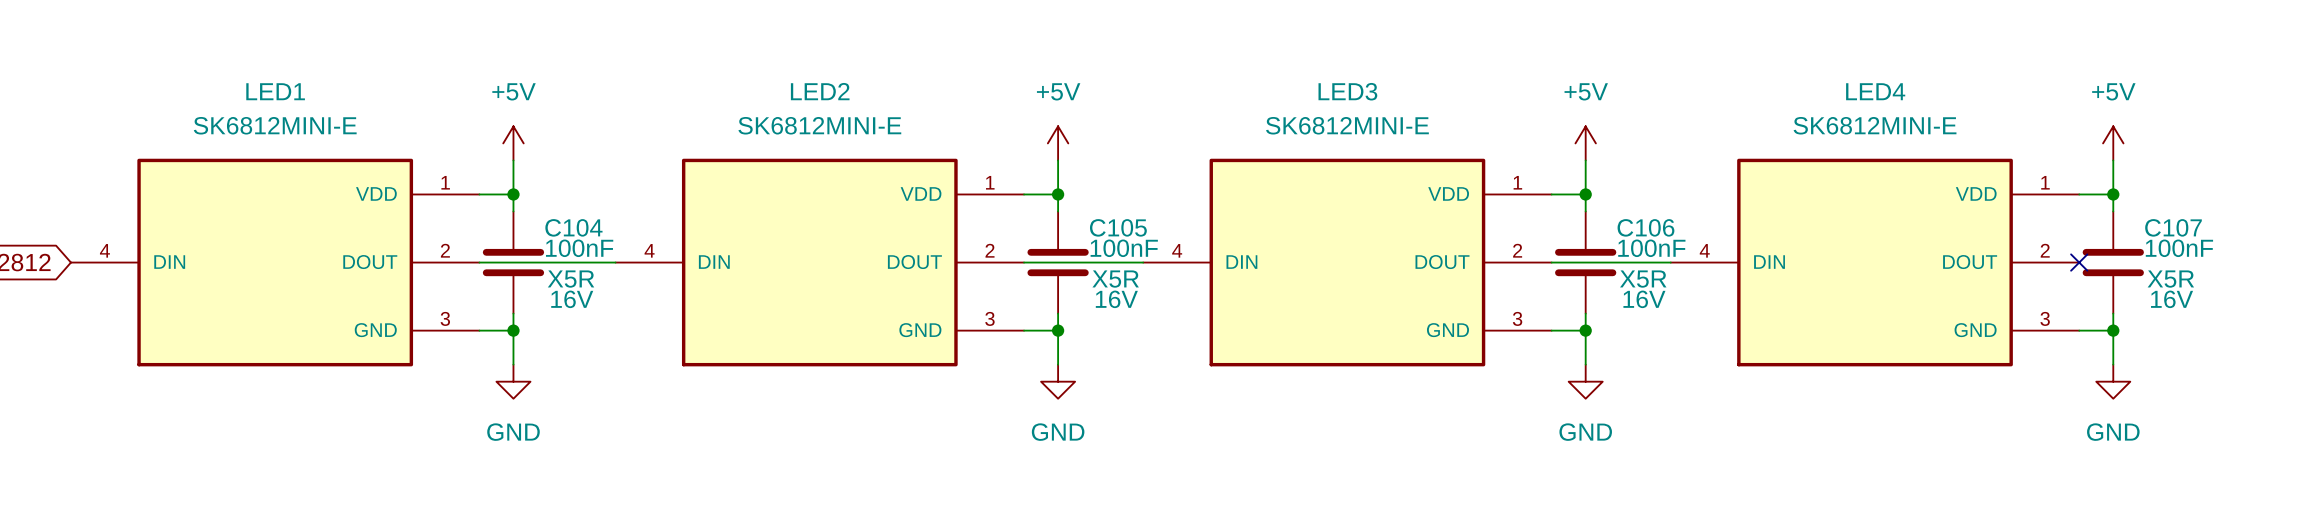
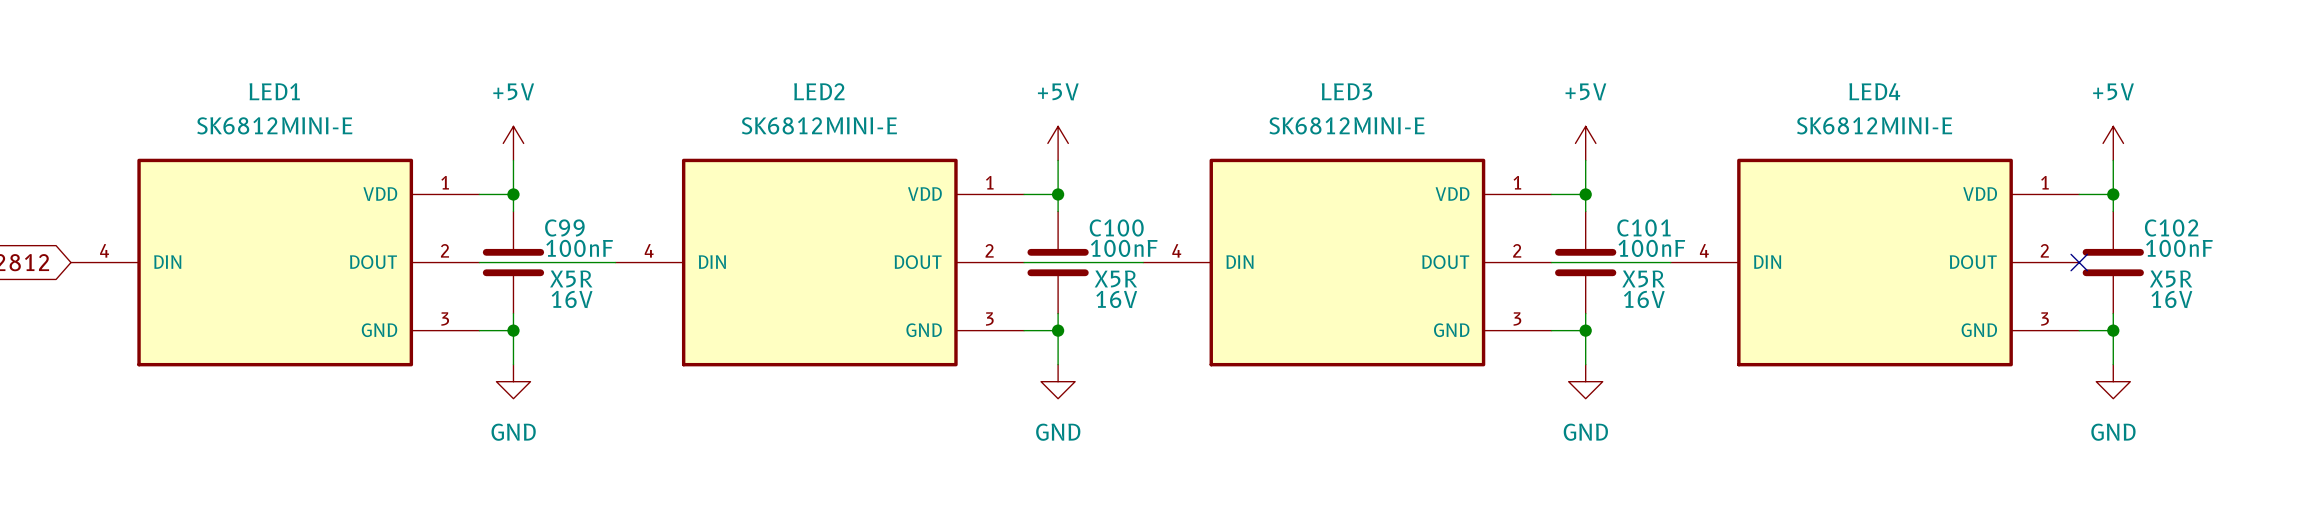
C104 name: C104 (573, 227) -> C99 (564, 227)
C105 name: C105 (1118, 227) -> C100 (1116, 227)
C106 name: C106 (1645, 227) -> C101 (1643, 227)
C107 name: C107 (2173, 227) -> C102 (2171, 227)

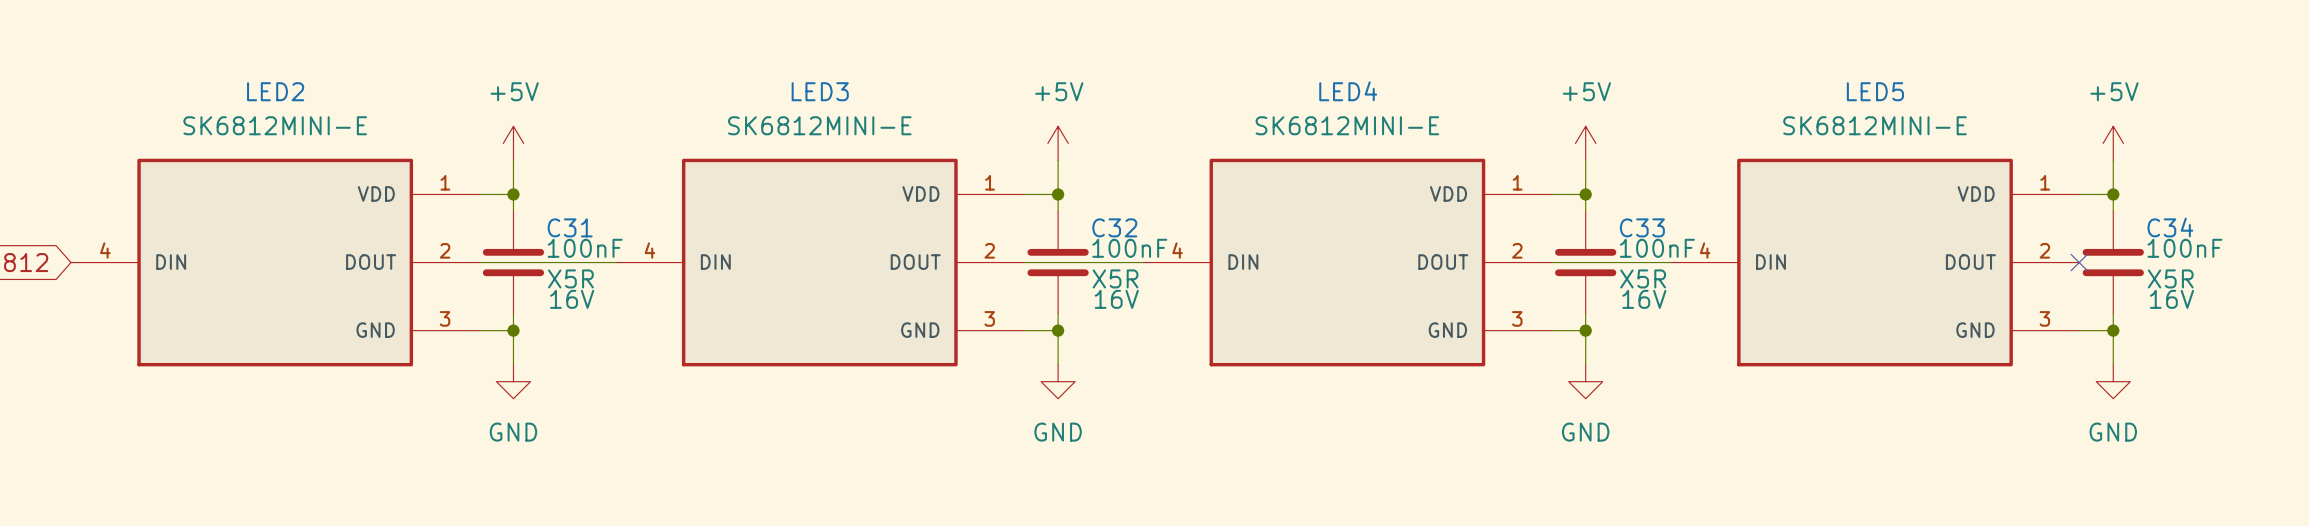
LED1 name: LED1 (274, 91) -> LED2 (275, 91)
LED2 name: LED2 (819, 91) -> LED3 (820, 91)
LED3 name: LED3 (1346, 91) -> LED4 (1348, 91)
LED4 name: LED4 (1874, 91) -> LED5 (1875, 91)
C99 name: C99 (564, 227) -> C31 (570, 227)
C100 name: C100 (1116, 227) -> C32 (1114, 227)
C101 name: C101 (1643, 227) -> C33 (1642, 227)
C102 name: C102 (2171, 227) -> C34 (2170, 227)

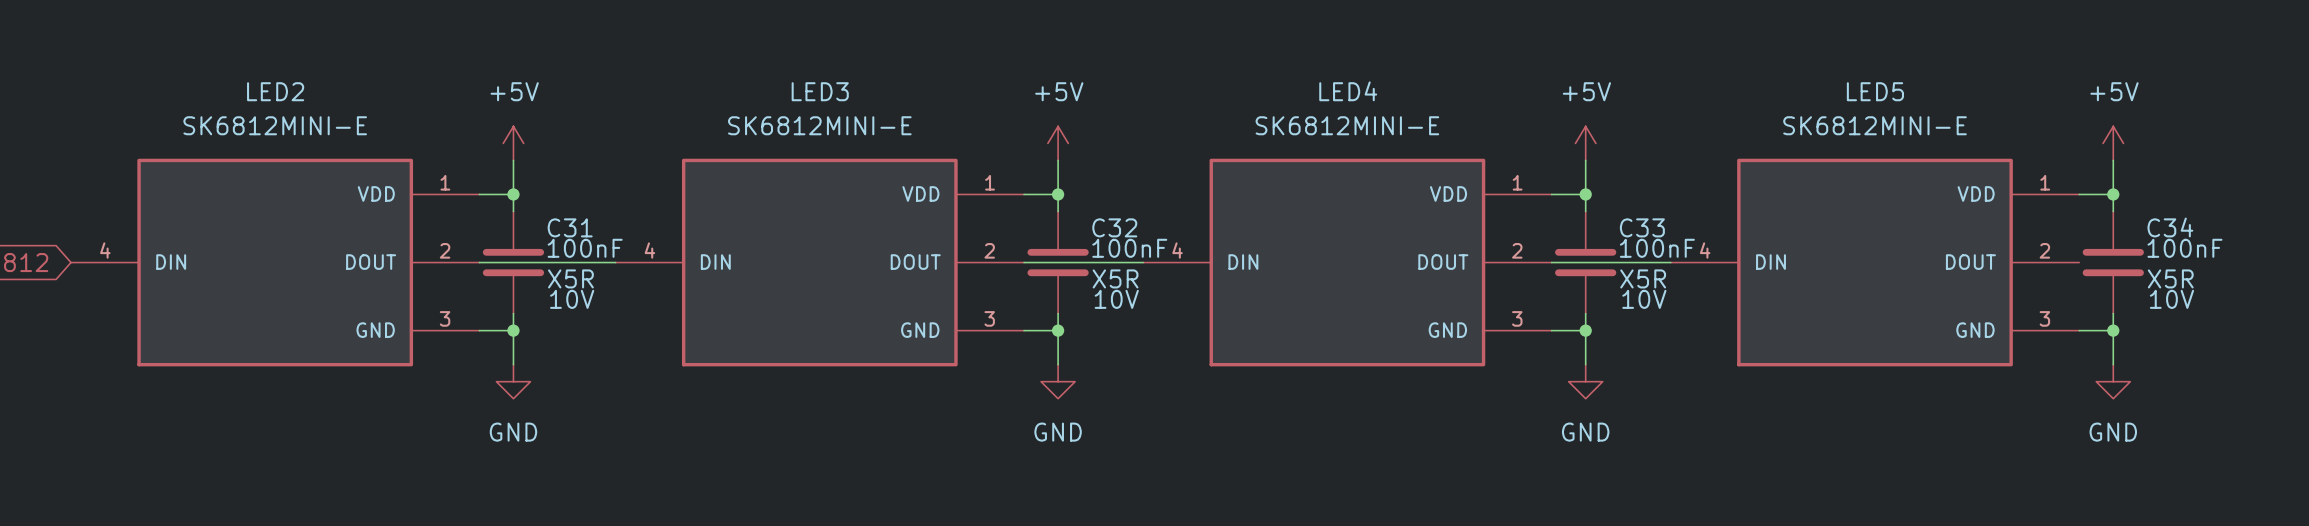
no-connect mark: (2079, 262) -> none
C31 text: 16V (572, 299) -> 10V (572, 299)
C32 text: 16V (1116, 299) -> 10V (1116, 299)
C33 text: 16V (1644, 299) -> 10V (1644, 299)
C34 text: 16V (2171, 299) -> 10V (2171, 299)

